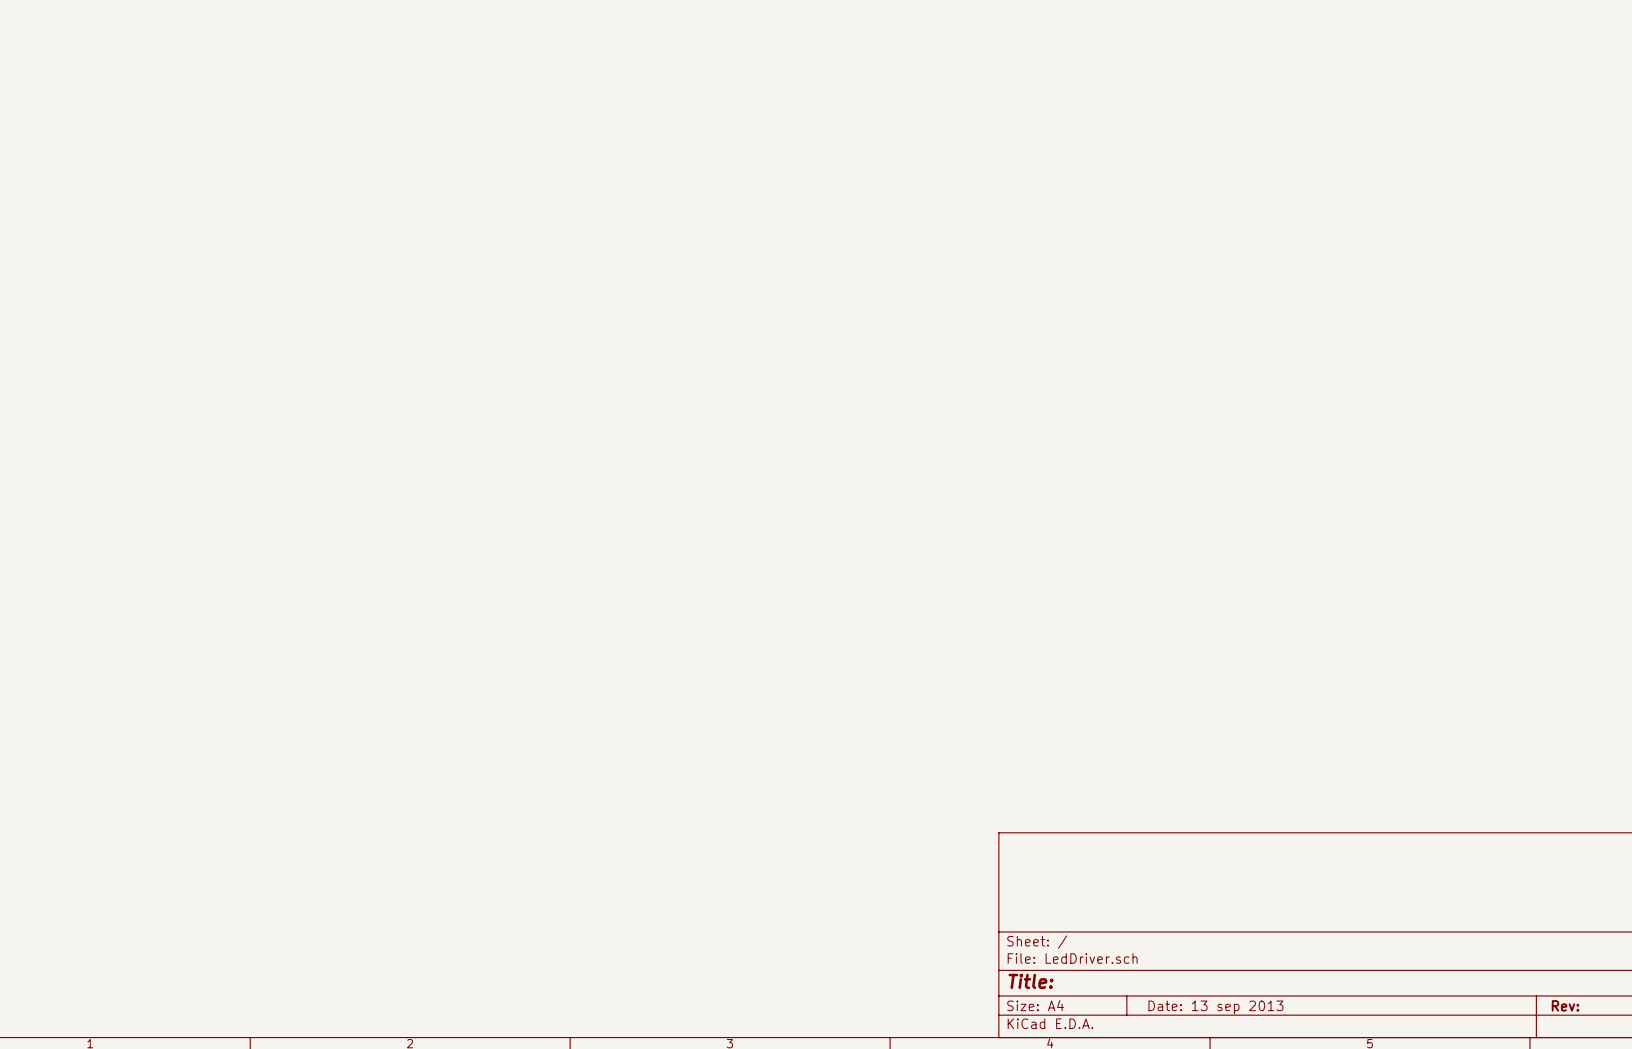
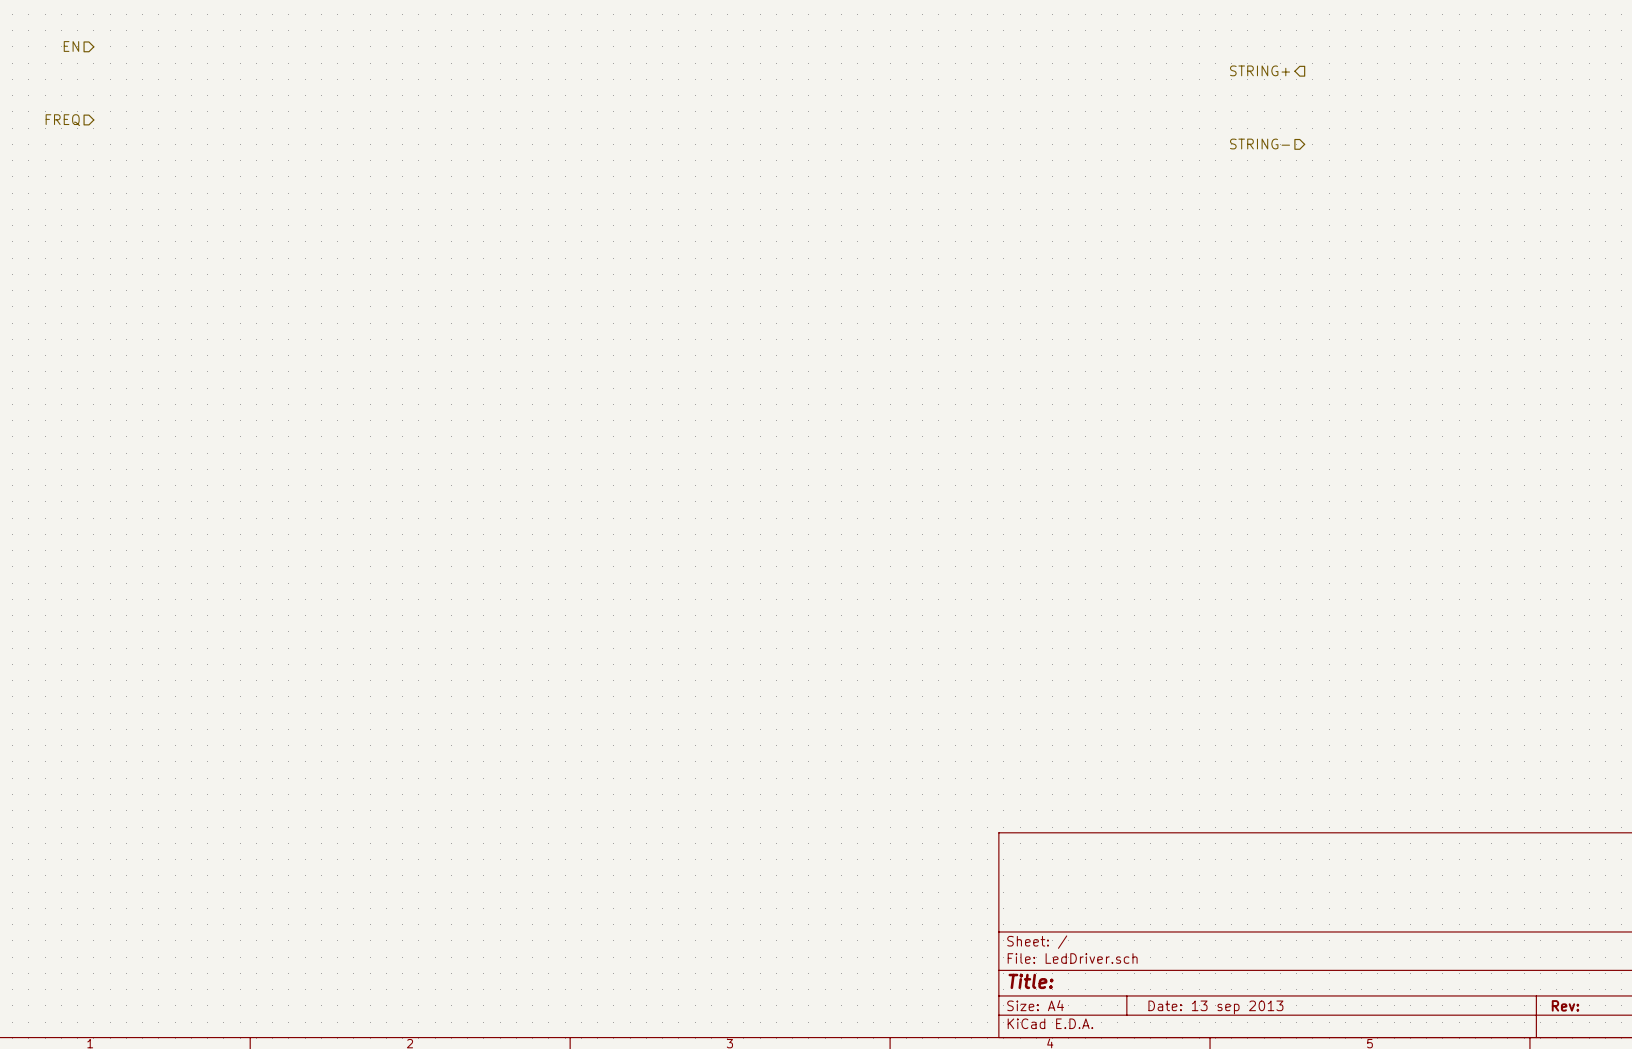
hierarchical label: none -> EN (71, 46)
hierarchical label: none -> STRING+ (1260, 70)
hierarchical label: none -> FREQ (62, 120)
hierarchical label: none -> STRING- (1260, 144)

